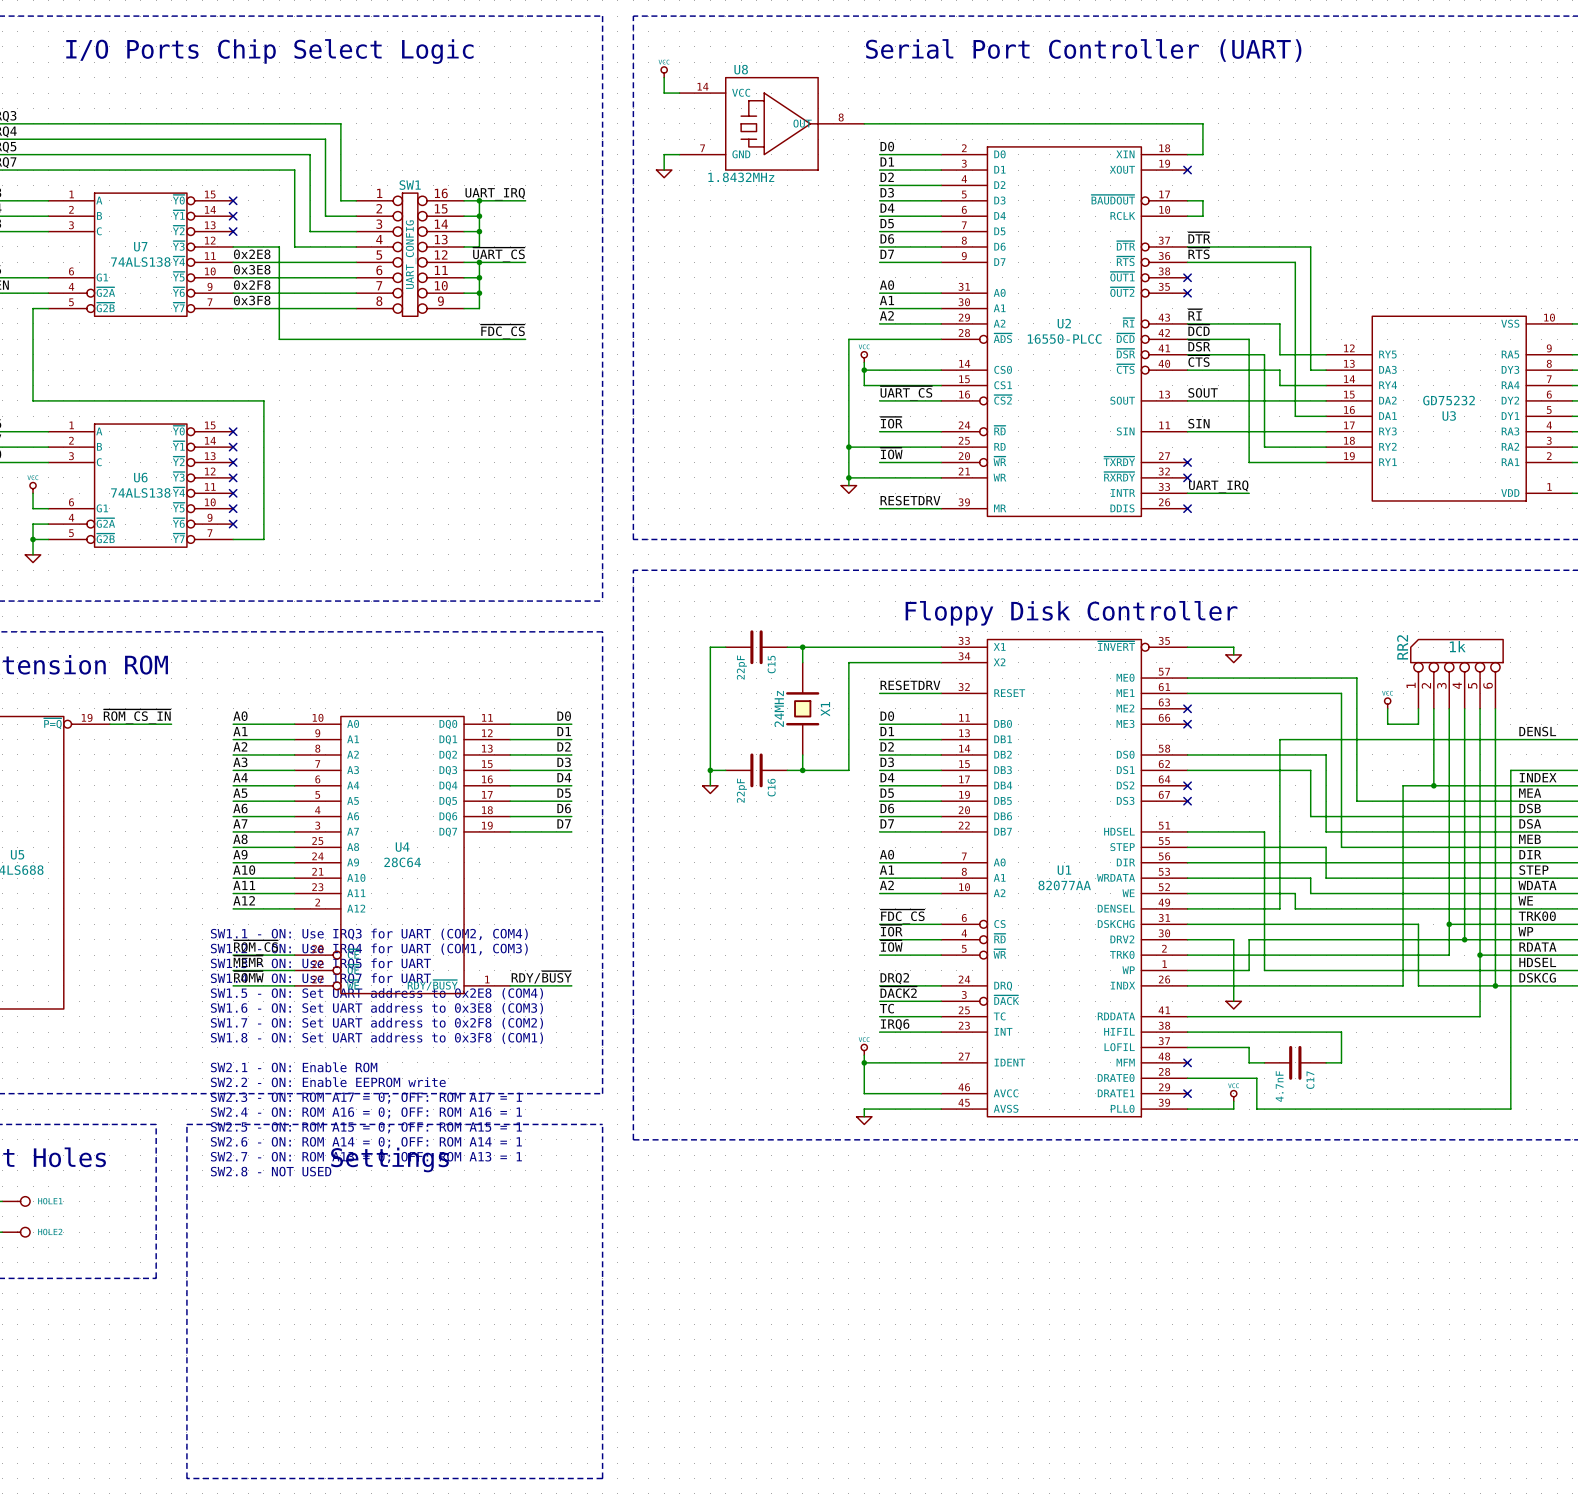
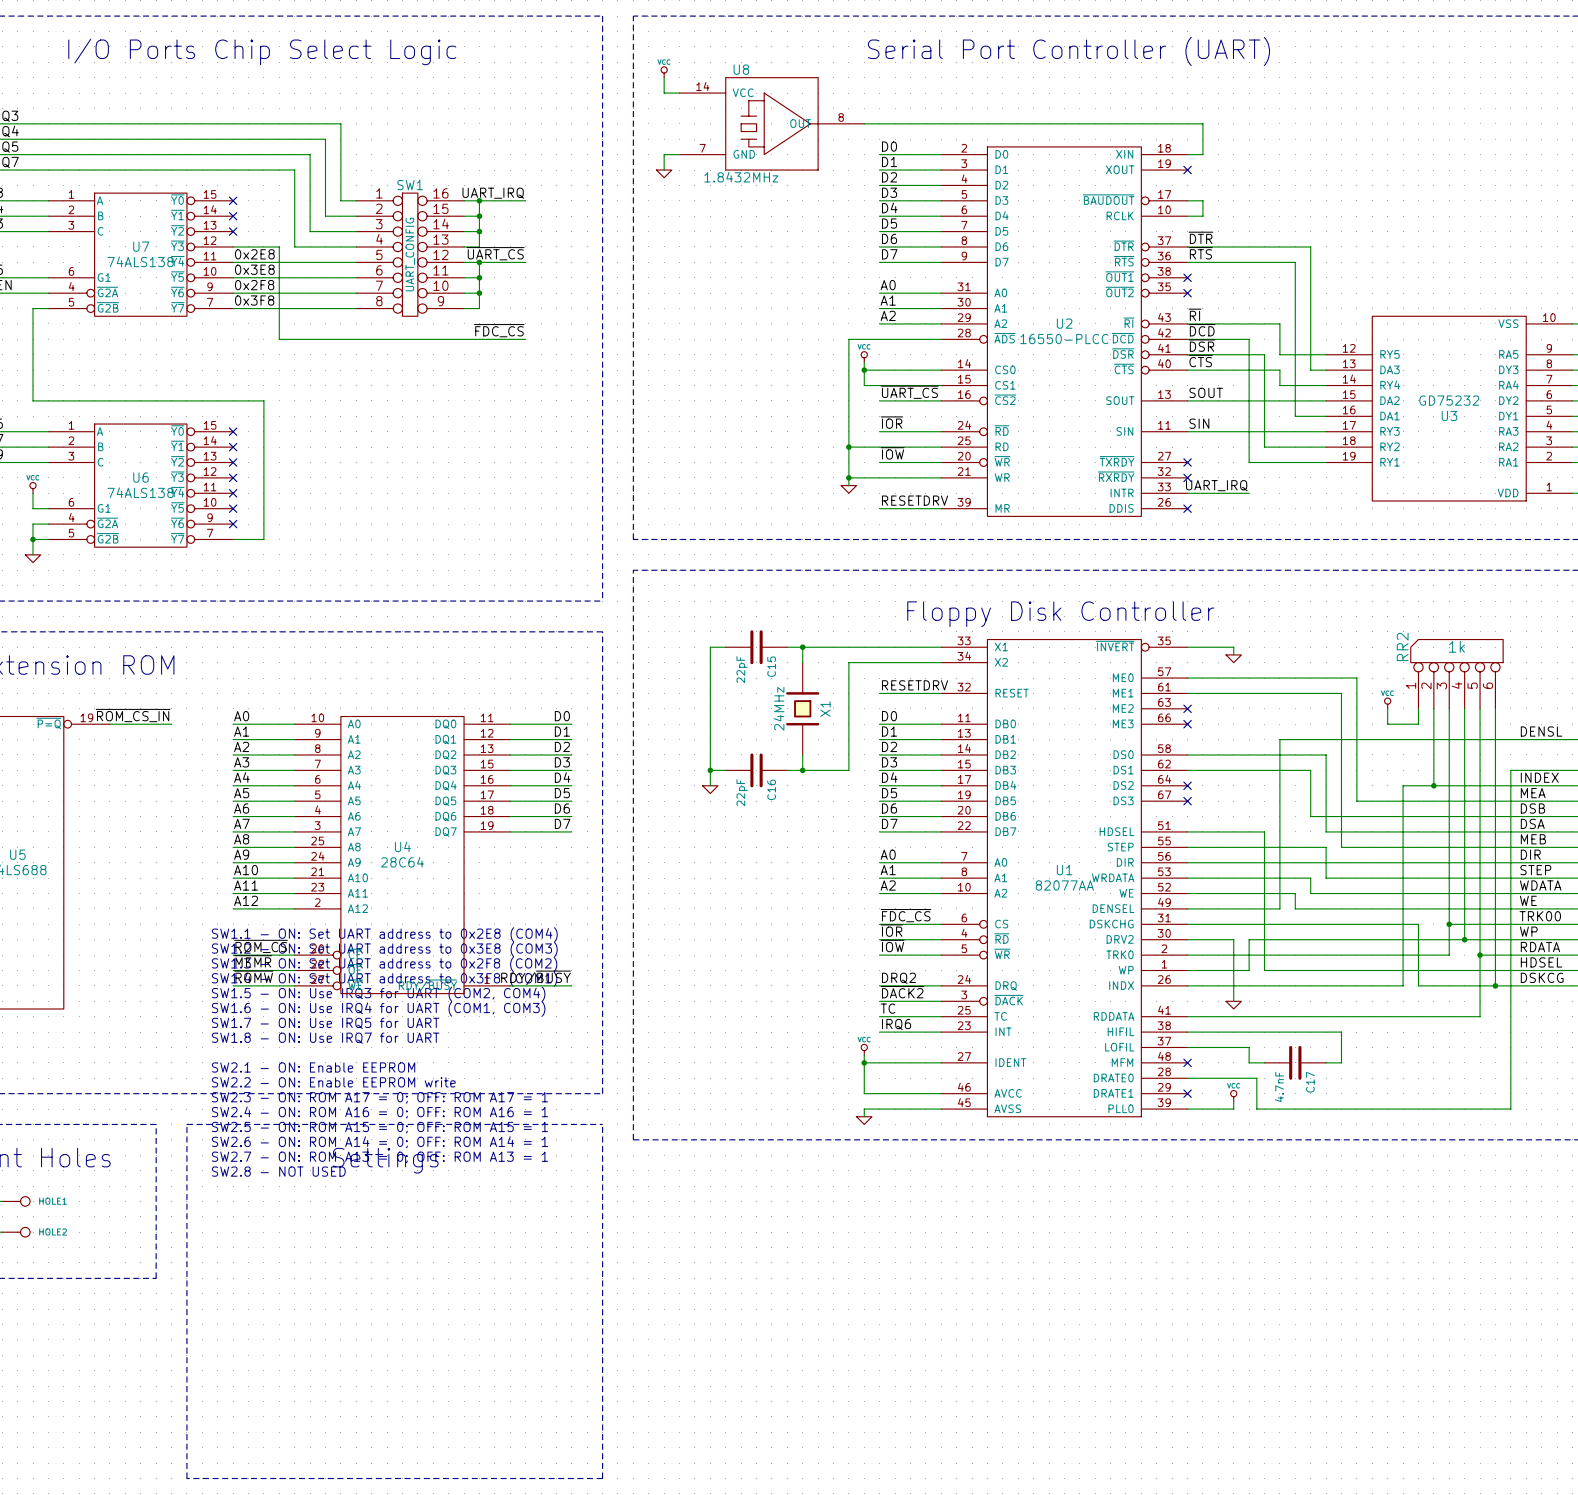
text: SW1.1 - ON: Use IRQ3 for UART (COM2, COM4) (369, 934) -> SW1.1 - ON: Set UART address to 0x2E8 (COM4) (384, 934)
text: SW1.2 - ON: Use IRQ4 for UART (COM1, COM3) (369, 949) -> SW1.2 - ON: Set UART address to 0x3E8 (COM3) (384, 949)
text: SW1.3 - ON: Use IRQ5 for UART (320, 964) -> SW1.3 - ON: Set UART address to 0x2F8 (COM2) (384, 964)
text: SW1.4 - ON: Use IRQ7 for UART (320, 978) -> SW1.4 - ON: Set UART address to 0x3F8 (COM1) (384, 979)
text: SW1.5 - ON: Set UART address to 0x2E8 (COM4) (376, 993) -> SW1.5 - ON: Use IRQ3 for UART (COM2, COM4) (378, 994)
text: SW1.6 - ON: Set UART address to 0x3E8 (COM3) (376, 1008) -> SW1.6 - ON: Use IRQ4 for UART (COM1, COM3) (378, 1009)
text: SW1.7 - ON: Set UART address to 0x2F8 (COM2) (376, 1023) -> SW1.7 - ON: Use IRQ5 for UART (325, 1023)
text: SW1.8 - ON: Set UART address to 0x3F8 (COM1) (376, 1038) -> SW1.8 - ON: Use IRQ7 for UART (325, 1038)
text: SW2.1 - ON: Enable ROM (294, 1067) -> SW2.1 - ON: Enable EEPROM (313, 1067)

